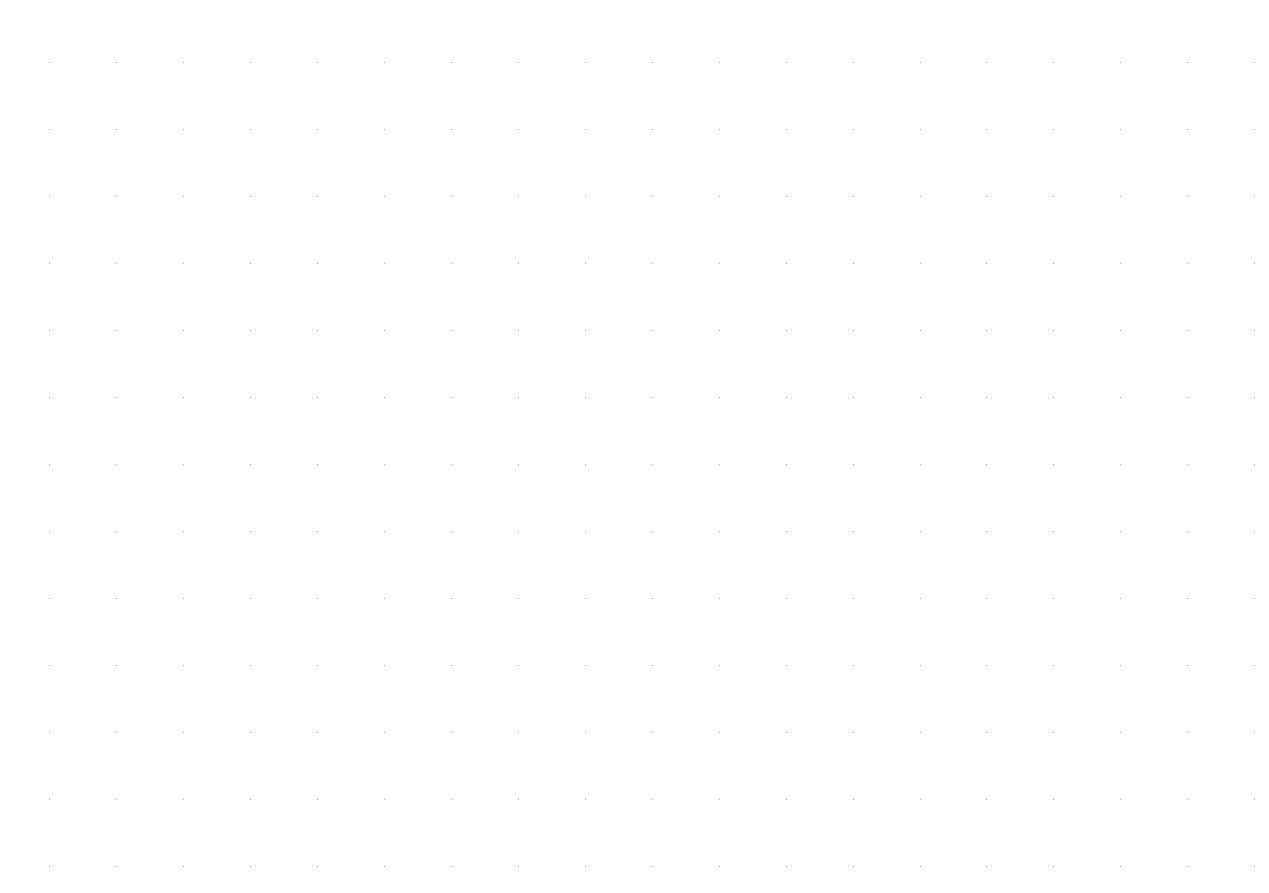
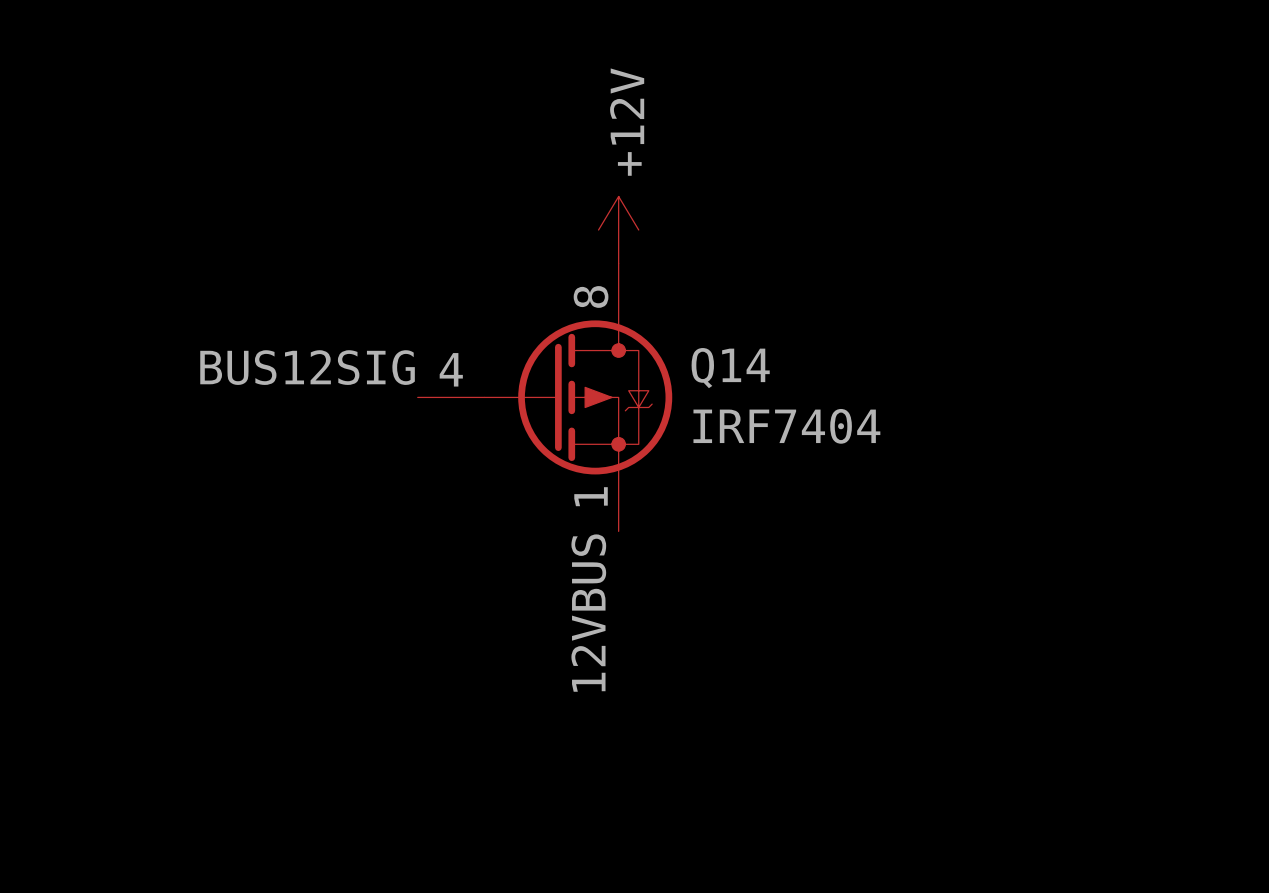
power symbol: none -> +12V (618, 230)
label: none -> BUS12SIG (307, 367)
Q14: none -> IRF7404 (544, 397)
label: none -> 12VBUS (588, 613)

